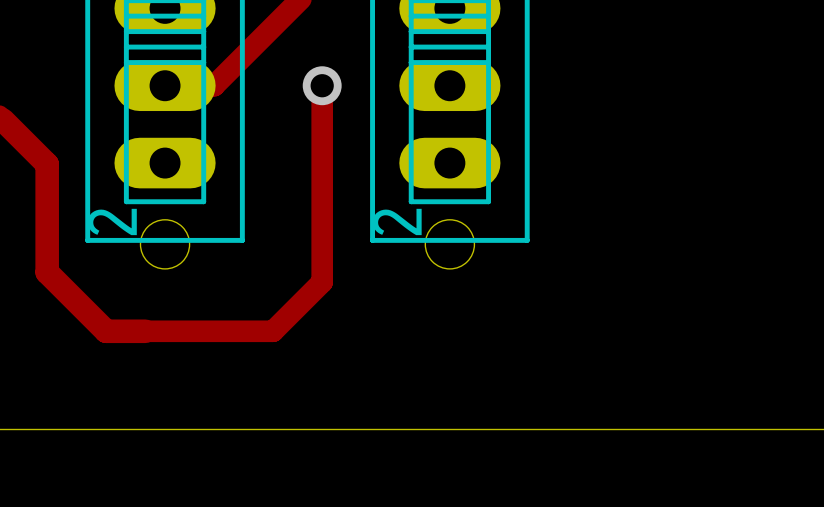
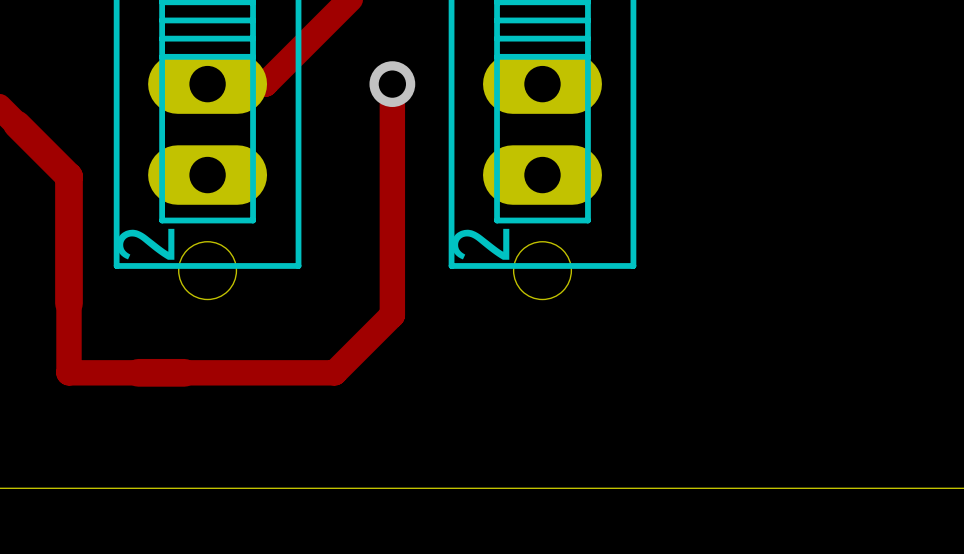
track: (47, 272) (106, 331) -> (68, 303) (68, 372) (138, 372)

